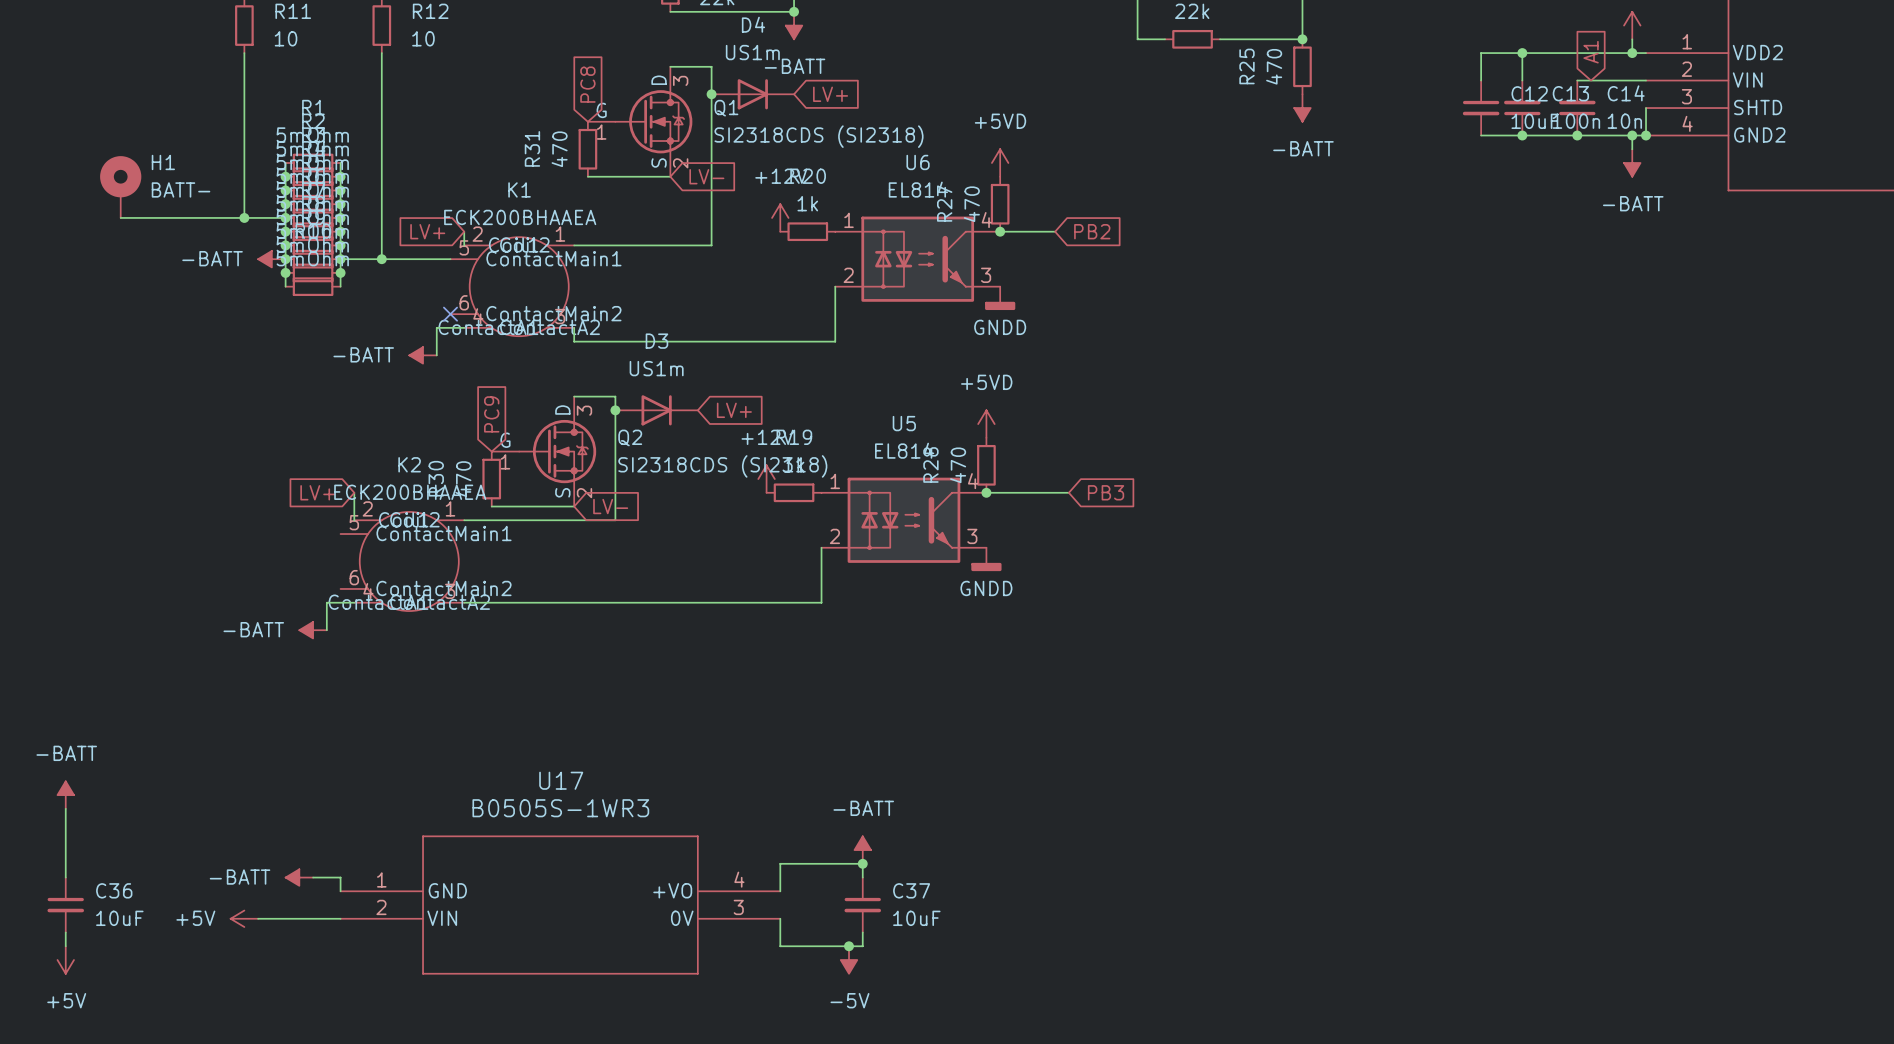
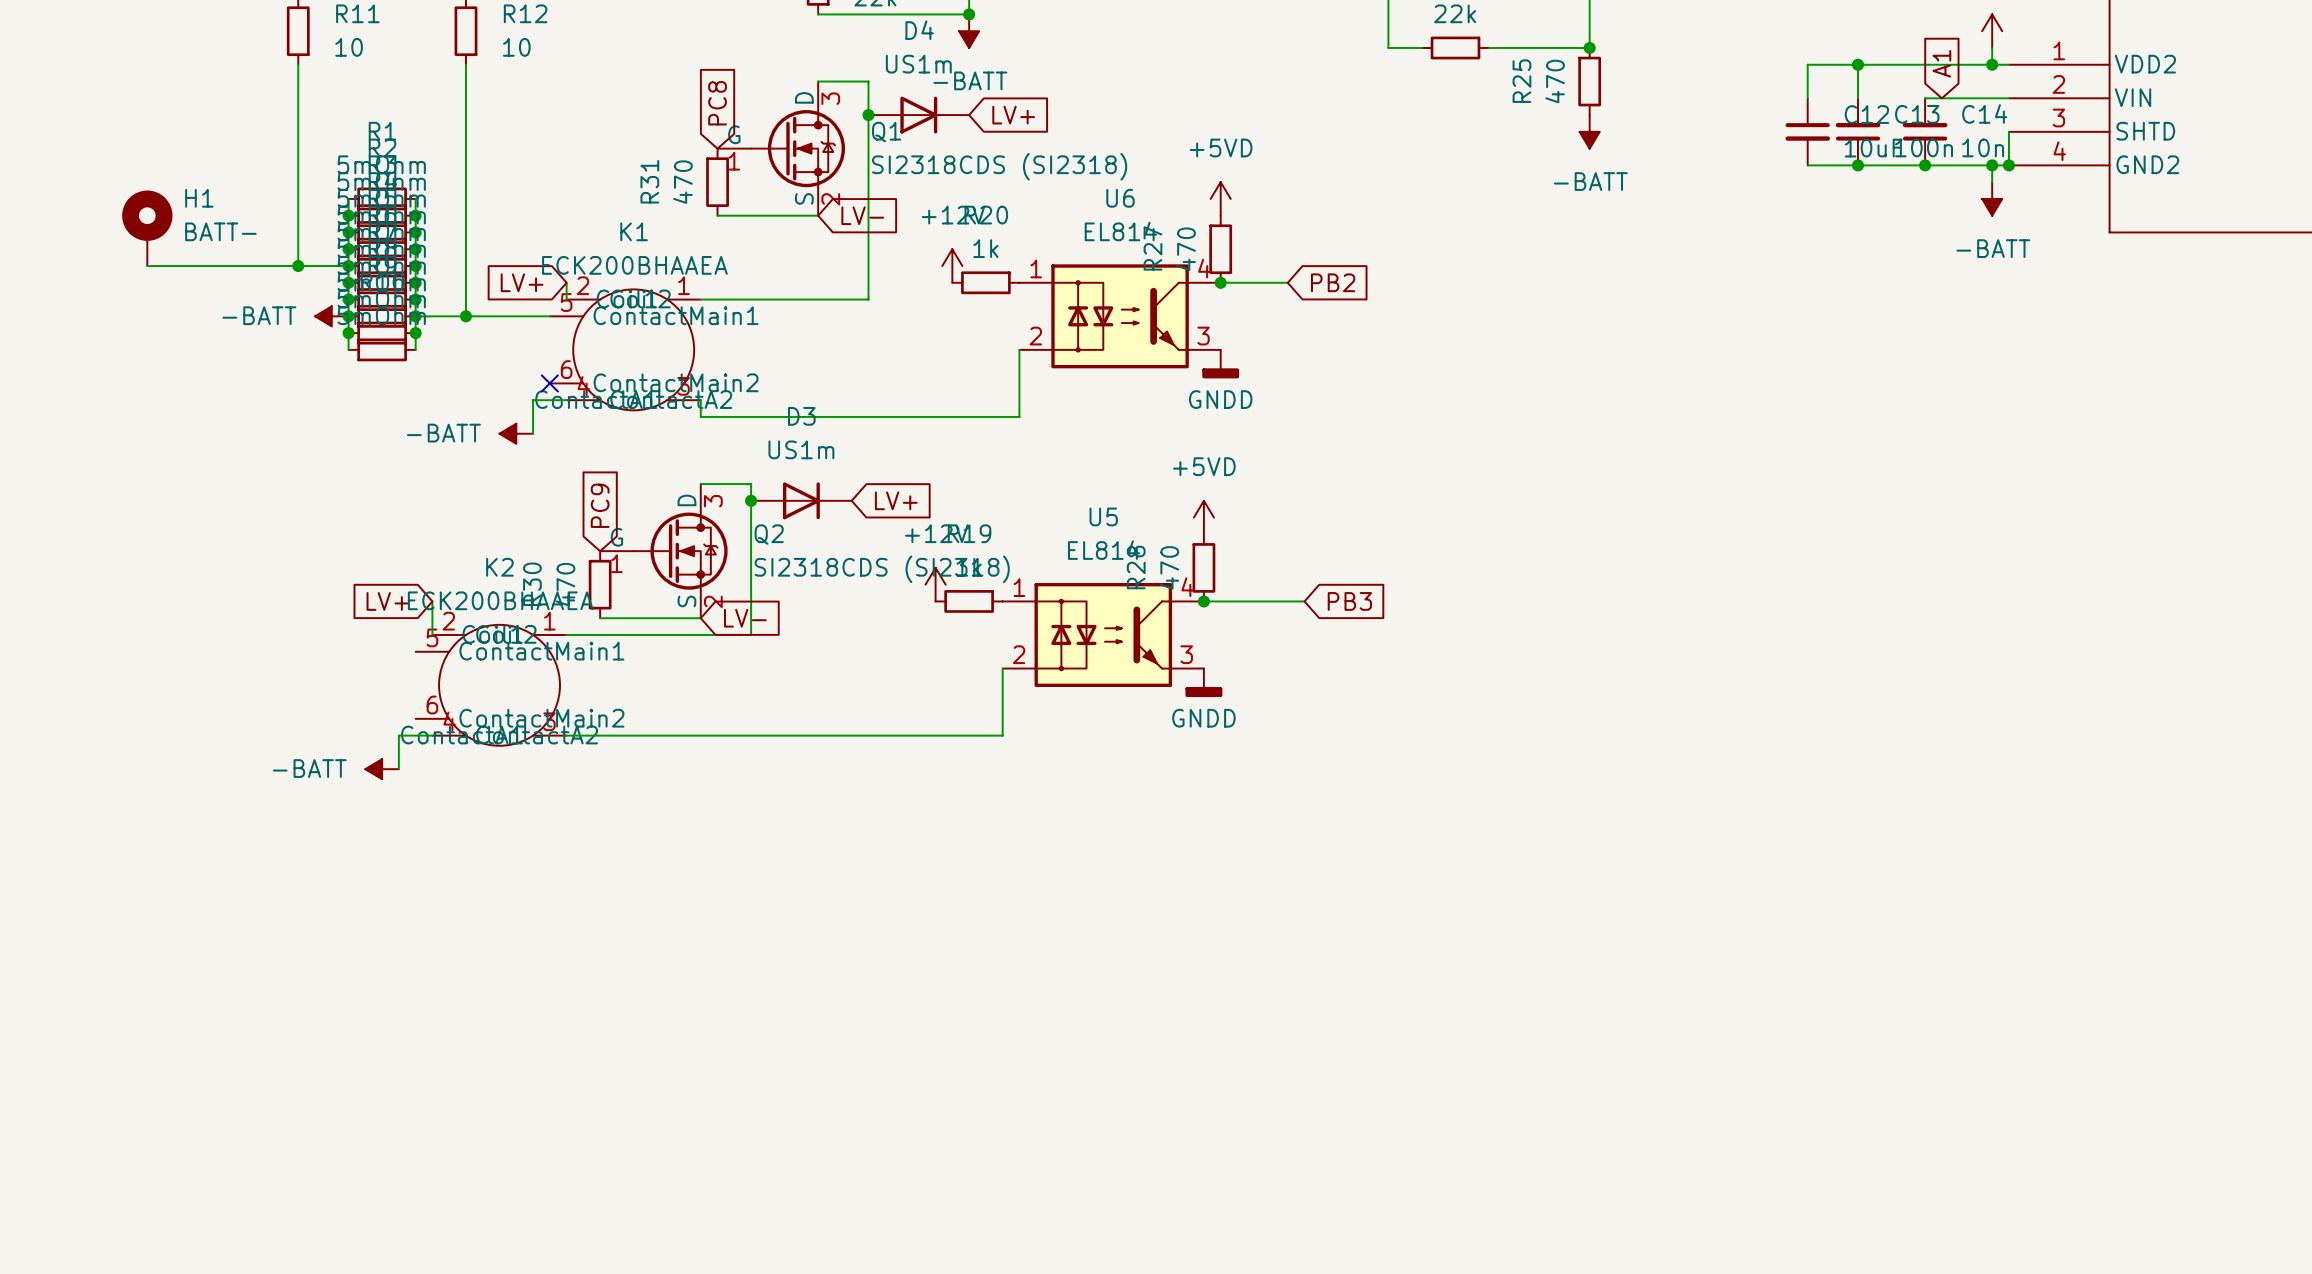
power symbol: -BATT (65, 795) -> none
wire: (65, 808) (65, 877) -> none
power symbol: -BATT (862, 850) -> none
junction: (862, 863) -> none
power symbol: -BATT (299, 877) -> none
wire: (313, 877) (340, 877) (340, 891) -> none
wire: (862, 877) (862, 863) (780, 863) (780, 891) -> none
C36: 10uF (65, 905) -> none
U17: B0505S-1WR3 (560, 905) -> none
C37: 10uF (862, 905) -> none
power symbol: +5V (244, 918) -> none
wire: (258, 918) (340, 918) -> none
wire: (780, 918) (780, 946) (862, 946) (862, 932) -> none
wire: (65, 932) (65, 946) -> none
junction: (849, 946) -> none
power symbol: +5V (65, 960) -> none
power symbol: -5V (849, 960) -> none

